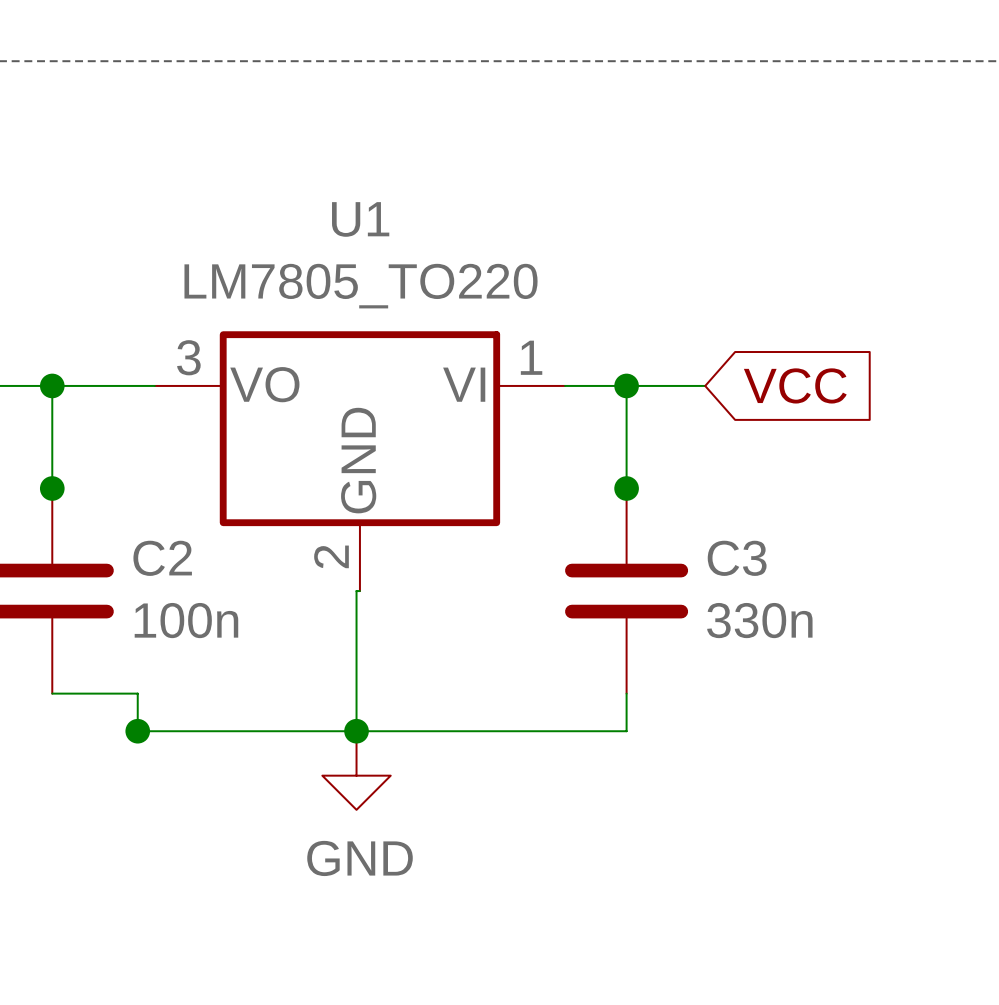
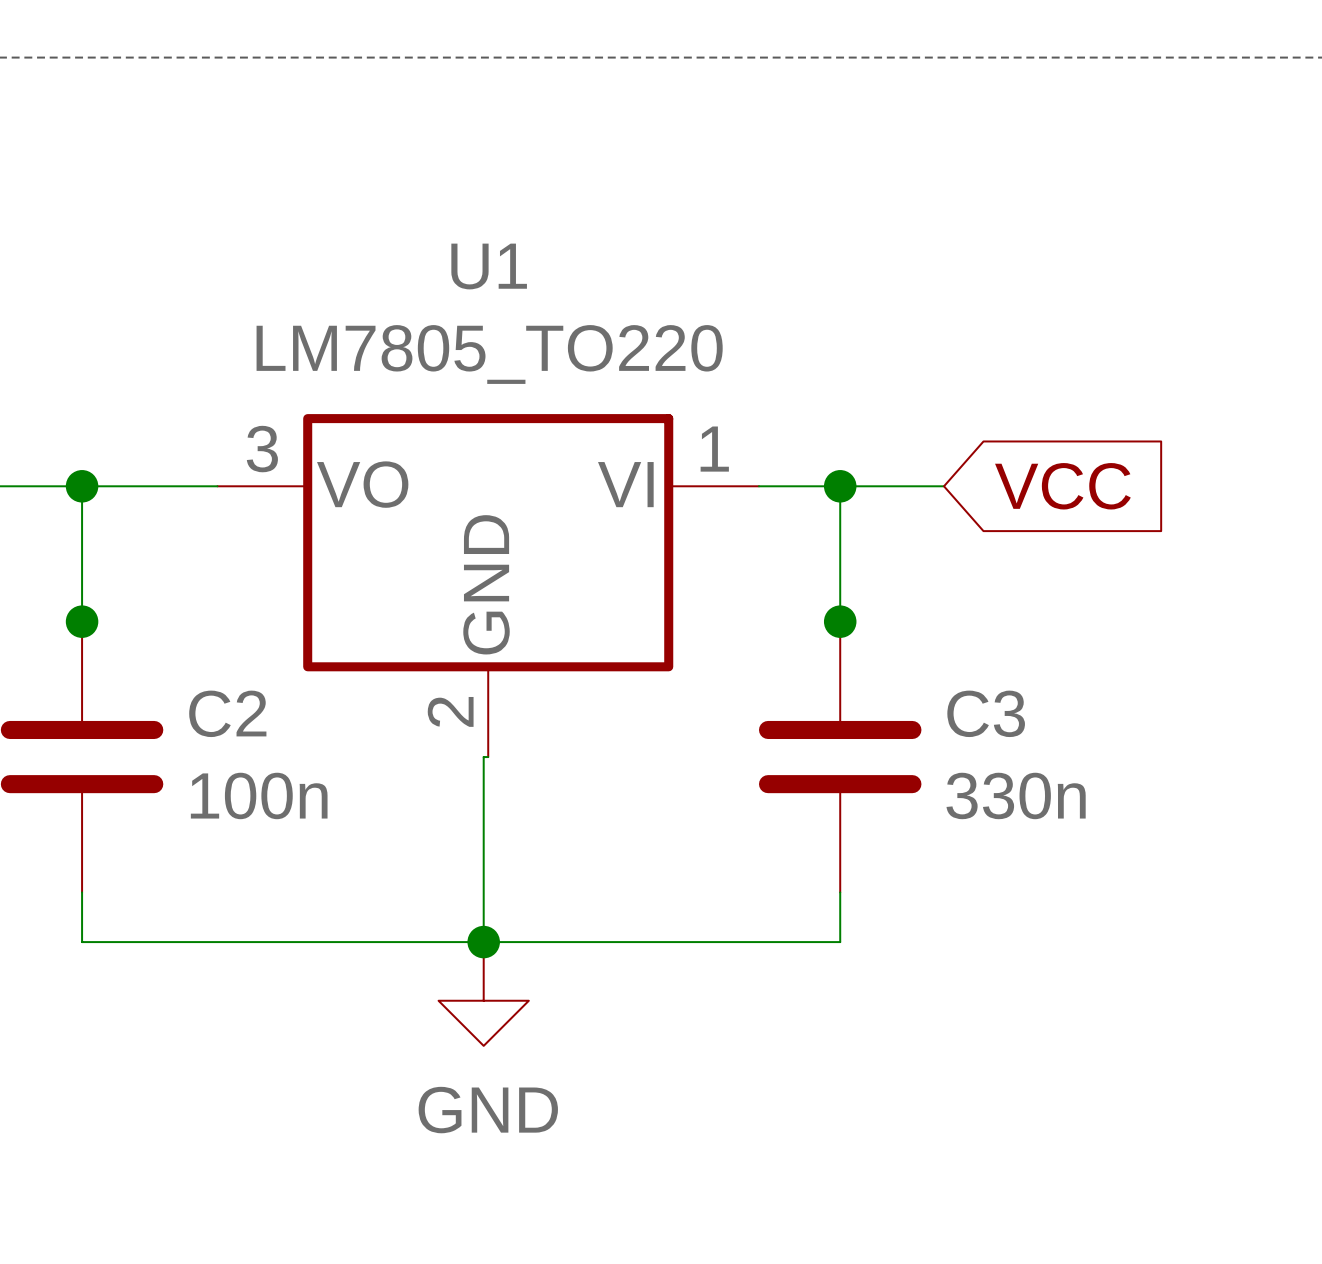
wire: (52, 693) (137, 693) (137, 731) -> (82, 892) (82, 942) (190, 942)
junction: (137, 731) -> none

